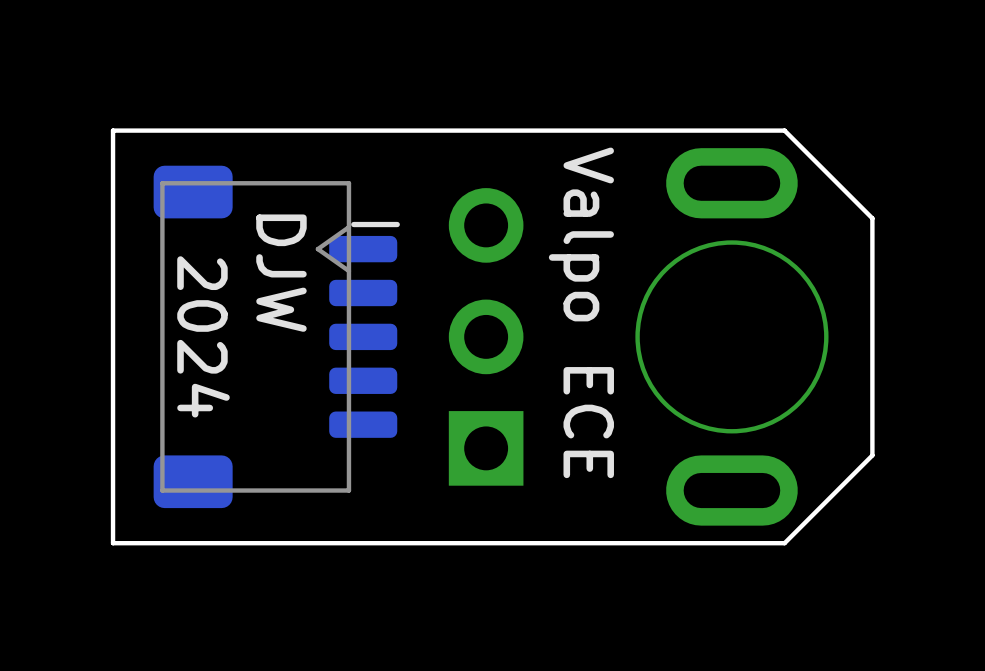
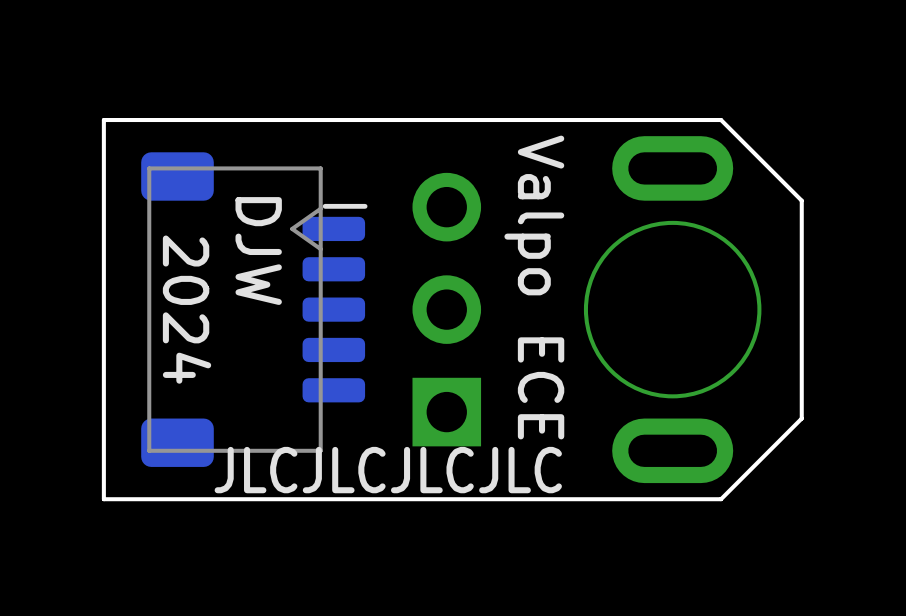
text: none -> JLCJLCJLCJLC (388, 470)

